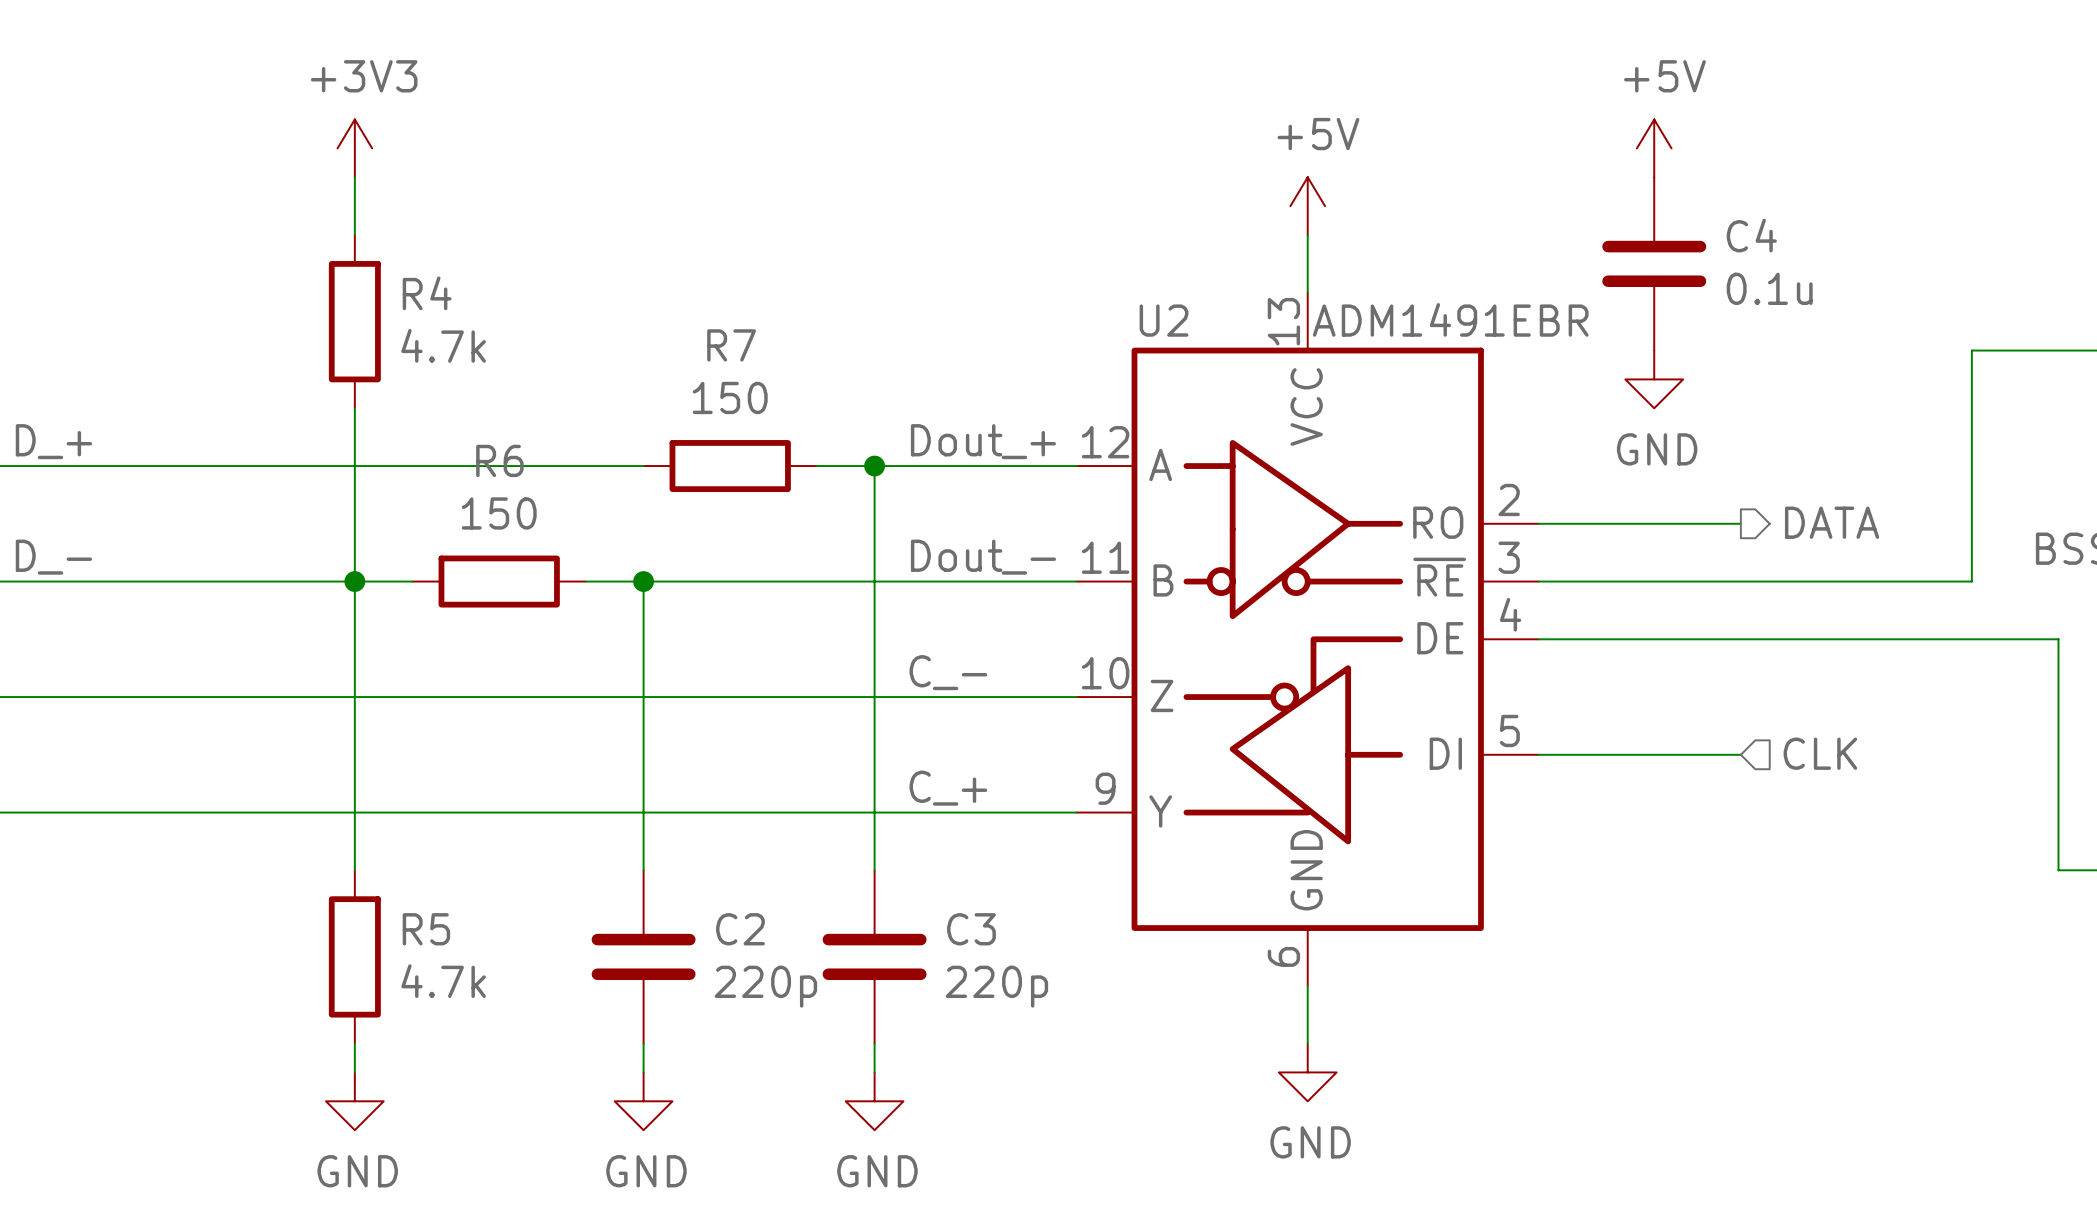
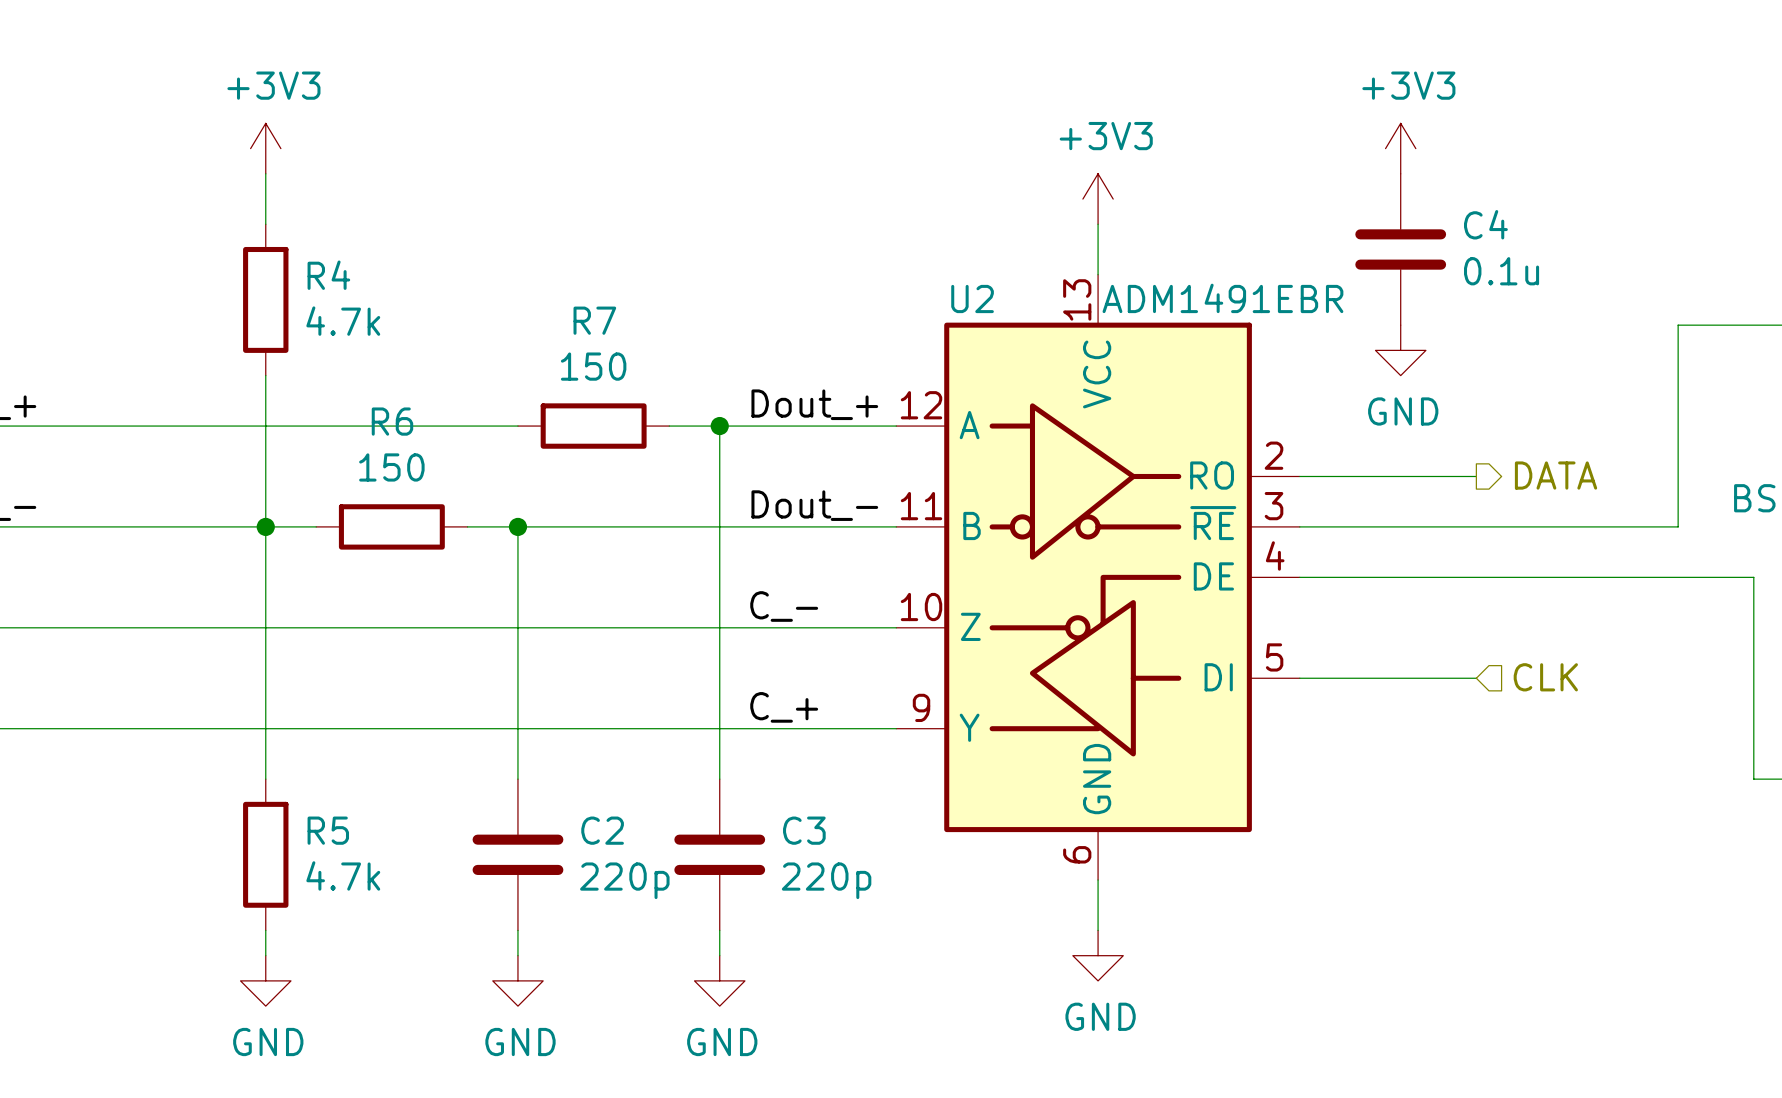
power symbol: +5V (1654, 148) -> +3V3 (1400, 148)
power symbol: +5V (1307, 206) -> +3V3 (1098, 199)

